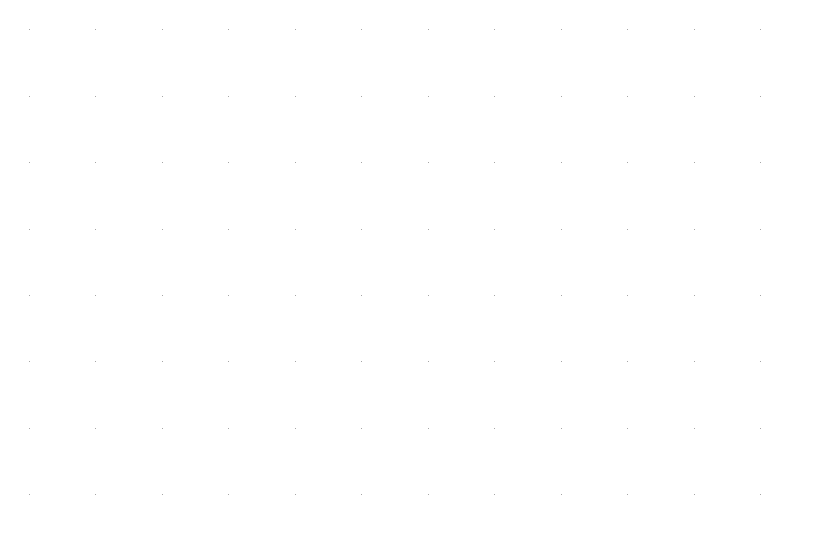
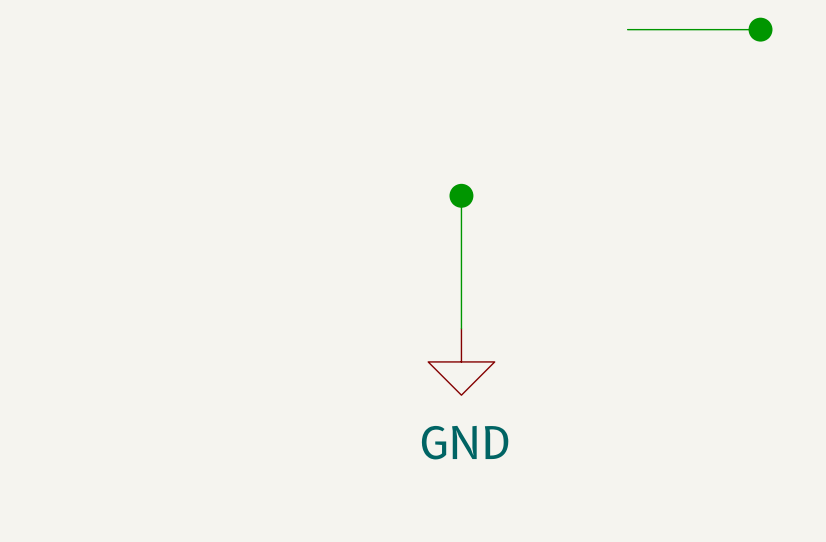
wire: none -> (627, 29) (760, 29)
junction: none -> (760, 29)
wire: none -> (461, 195) (461, 328)
junction: none -> (461, 195)
power symbol: none -> GND (461, 361)

